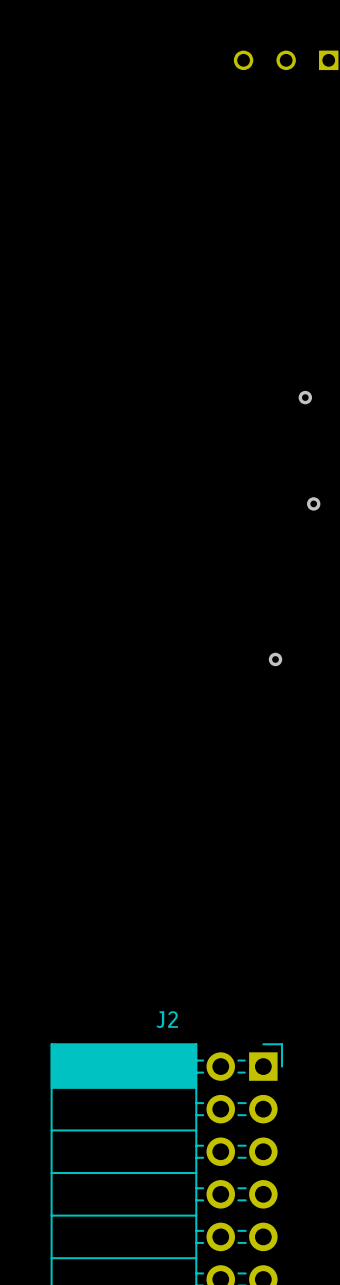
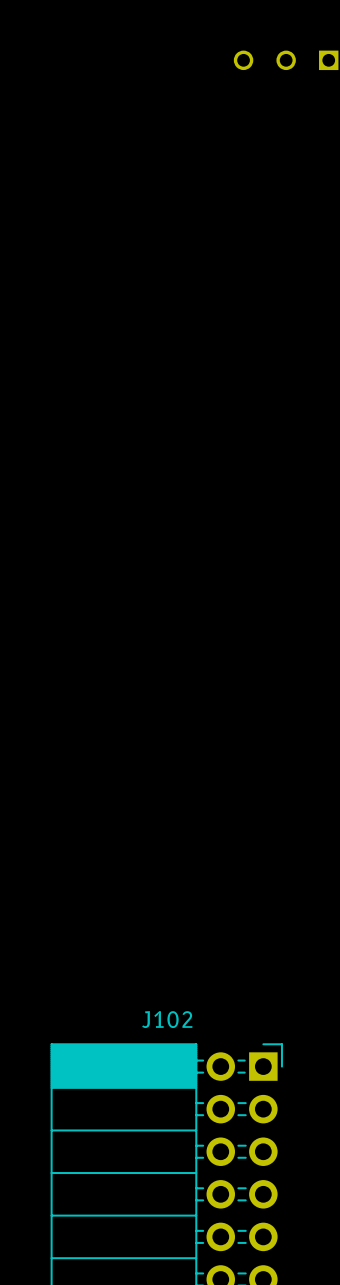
via: (305, 397) -> none
via: (313, 503) -> none
via: (275, 659) -> none
J2 name: J2 (167, 1019) -> J102 (167, 1019)

